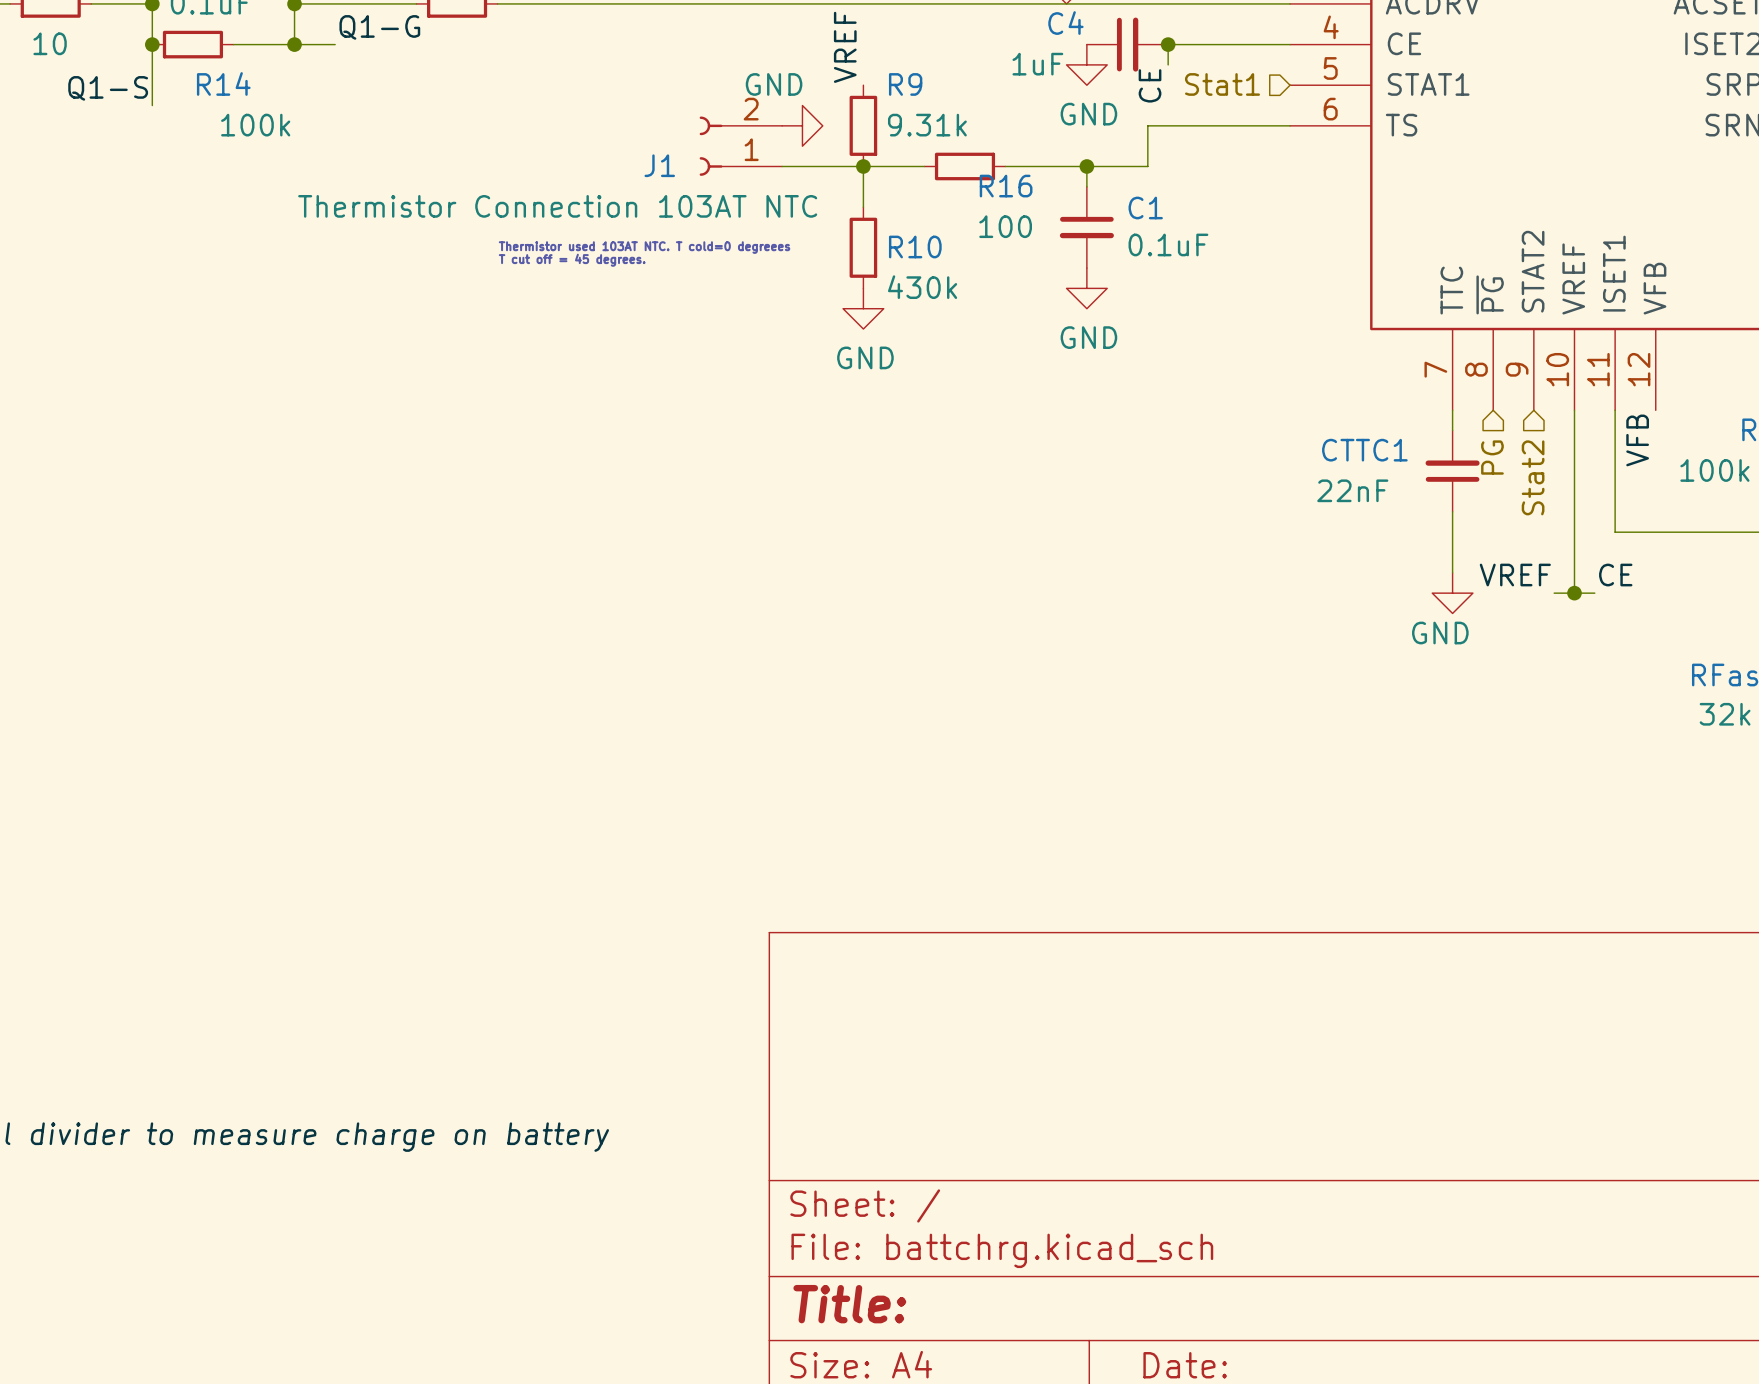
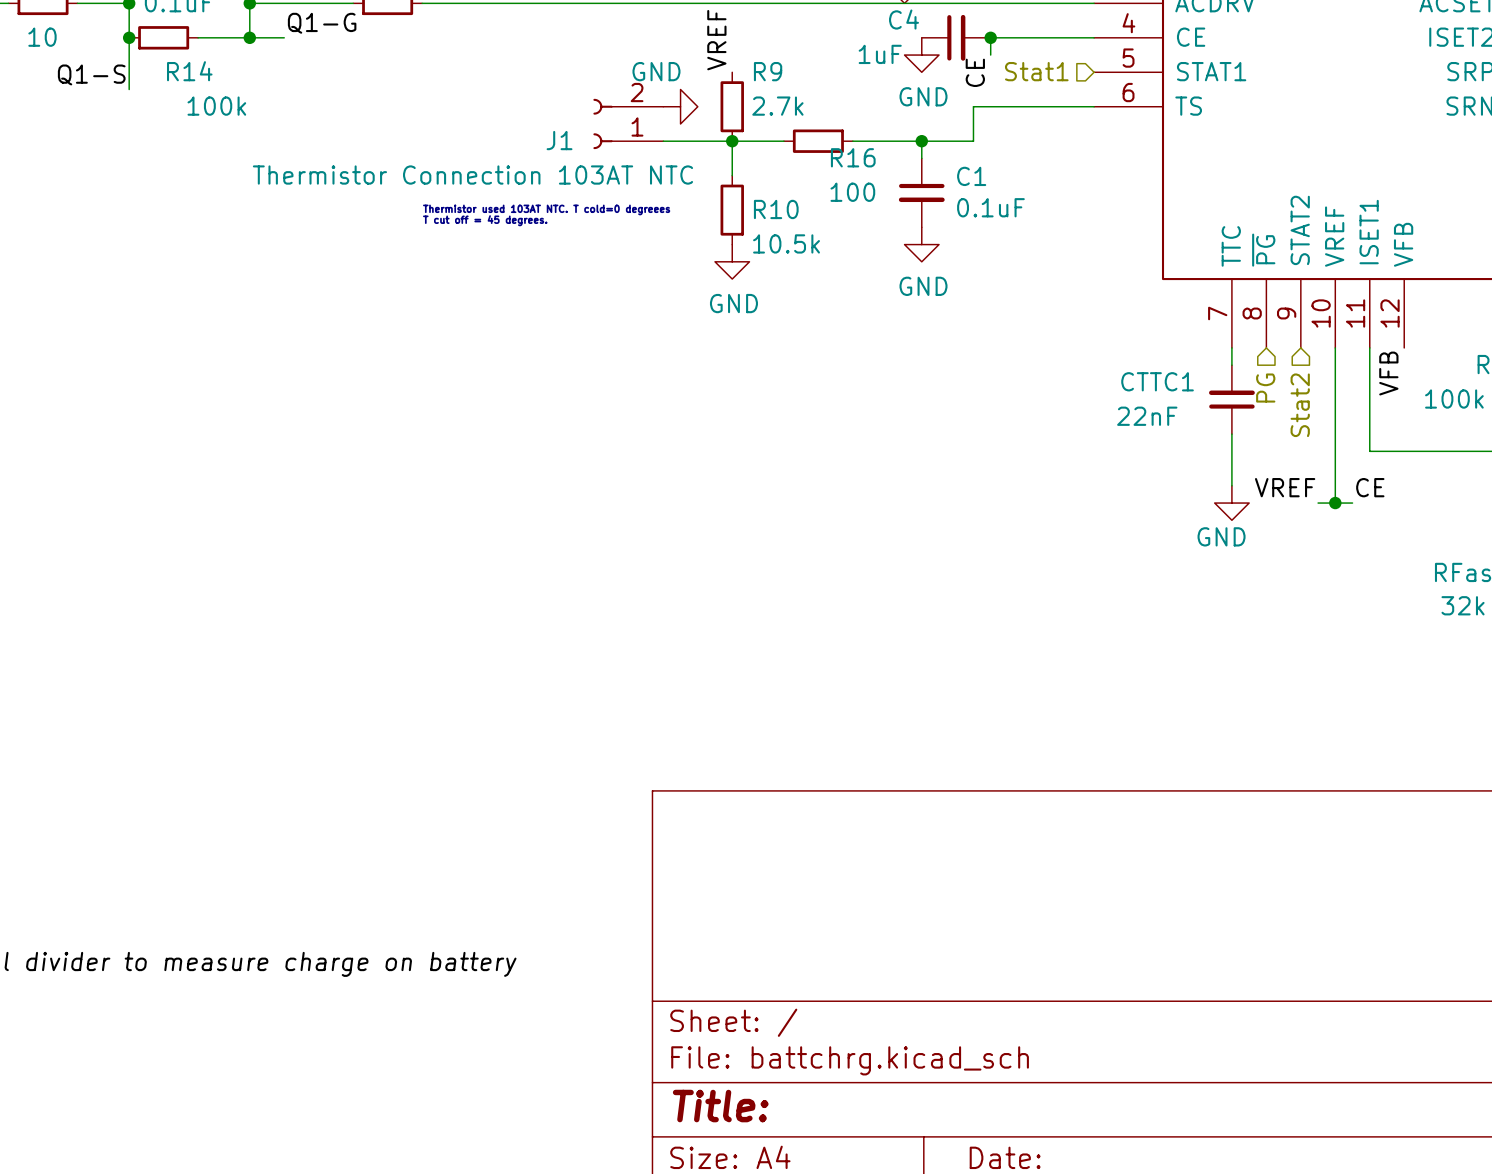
R9 value: 9.31k (927, 125) -> 2.7k (777, 106)
R10 value: 430k (922, 287) -> 10.5k (786, 243)

